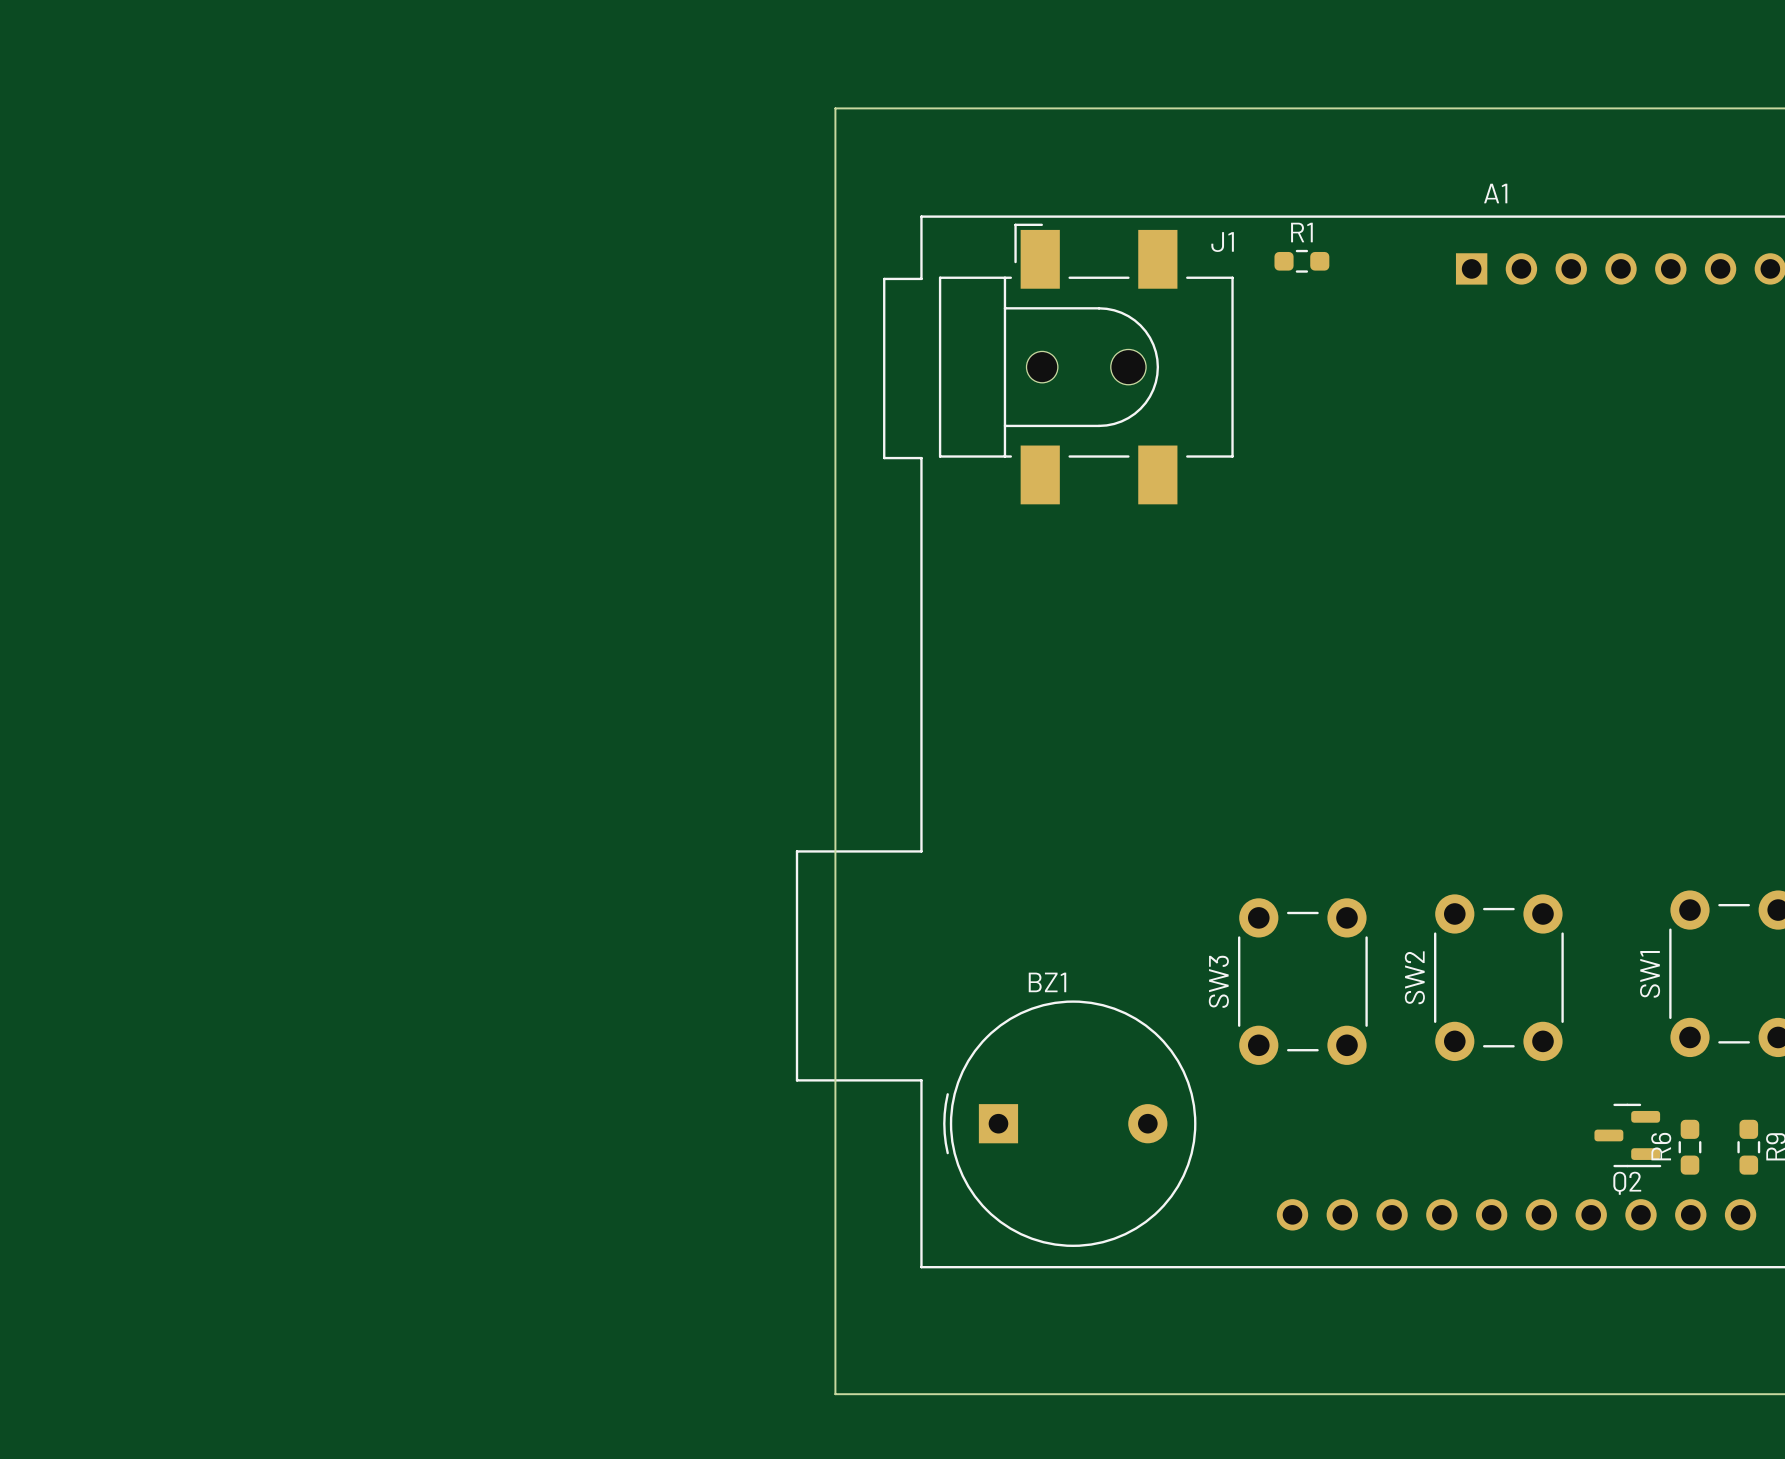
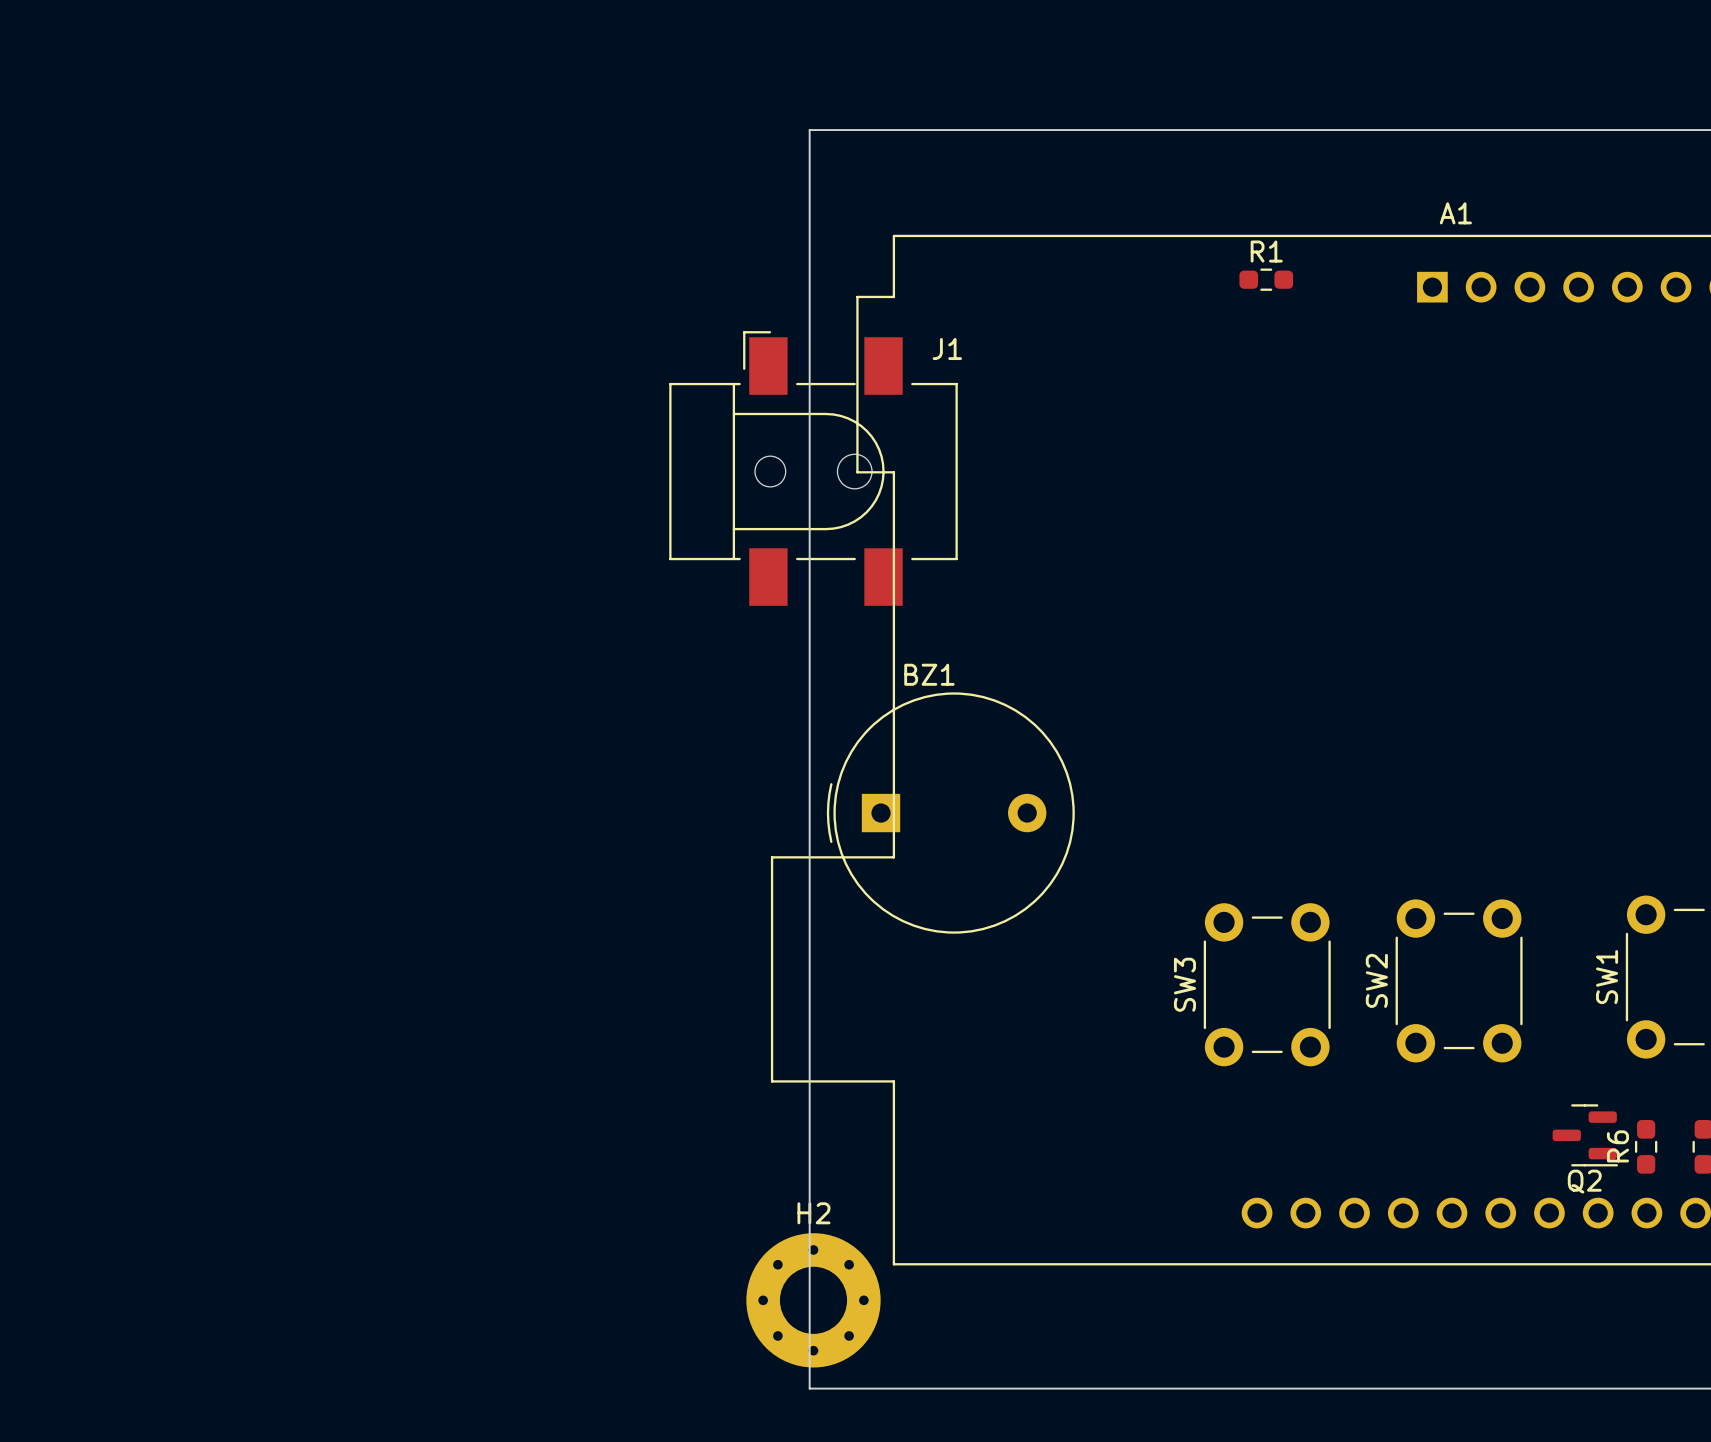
J1 position: (1086, 363) -> (813, 468)
BZ1 position: (1069, 1123) -> (950, 813)
H2: none -> (813, 1300)

